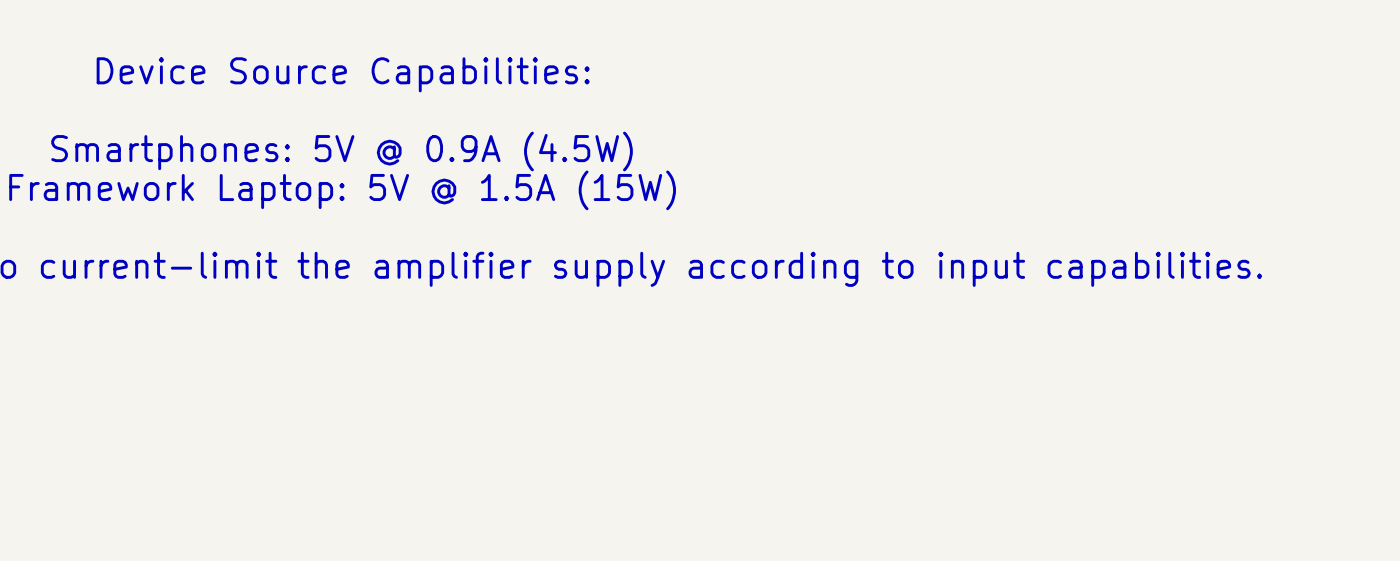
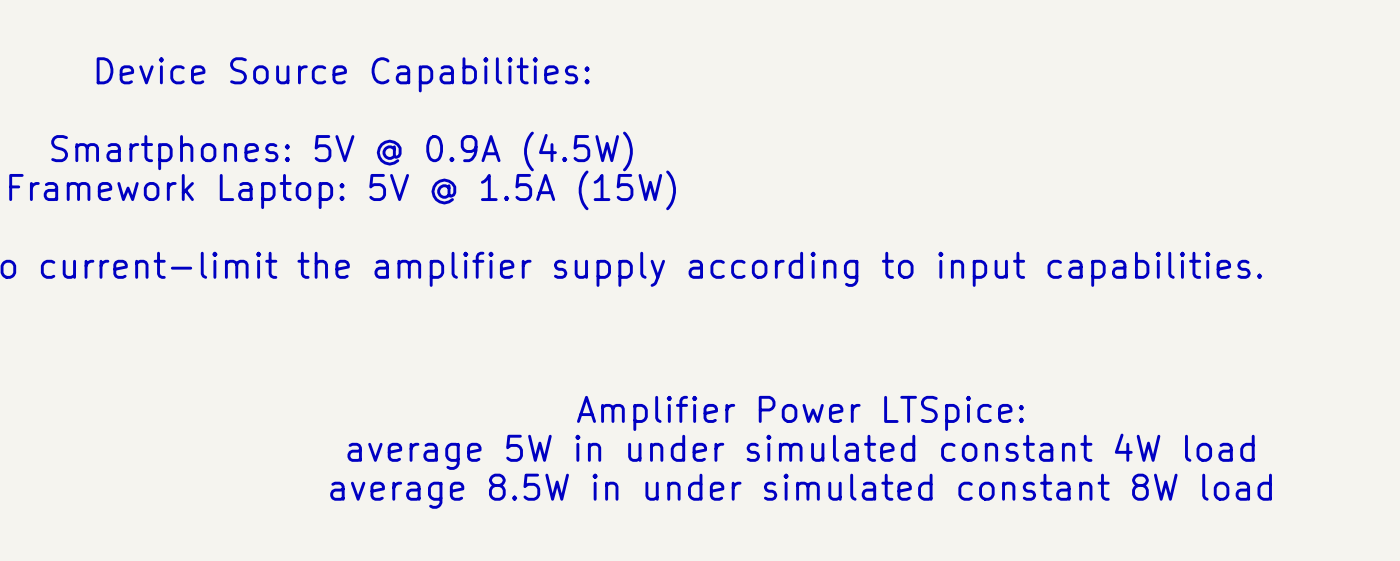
text: none -> Amplifier Power LTSpice: (800, 413)
text: none -> average 5W in under simulated constant 4W load (801, 451)
text: none -> average 8.5W in under simulated constant 8W load (801, 491)

